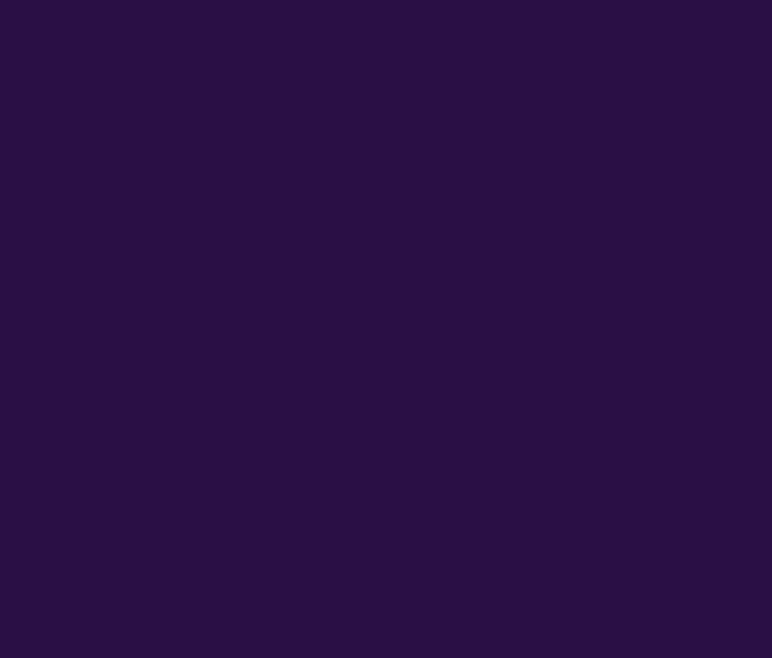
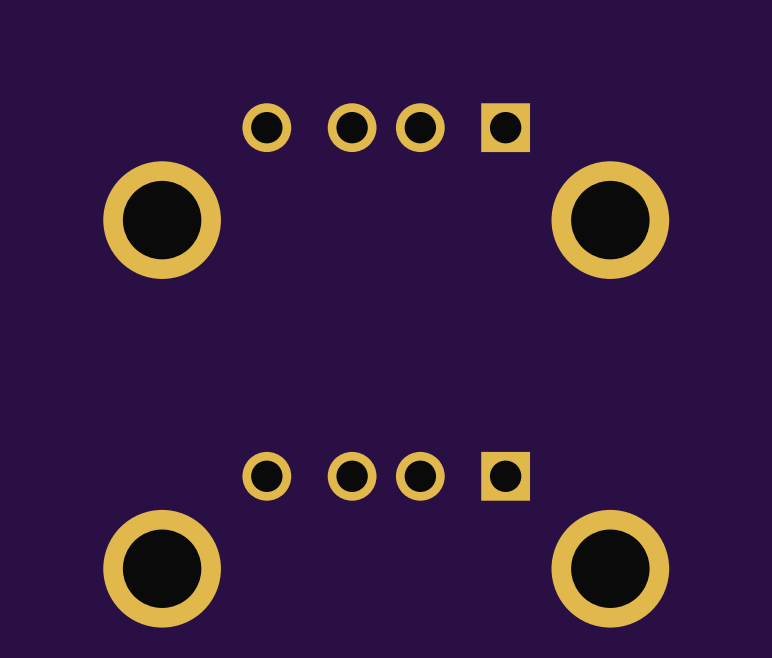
part: none -> (386, 191)
part: none -> (386, 539)

